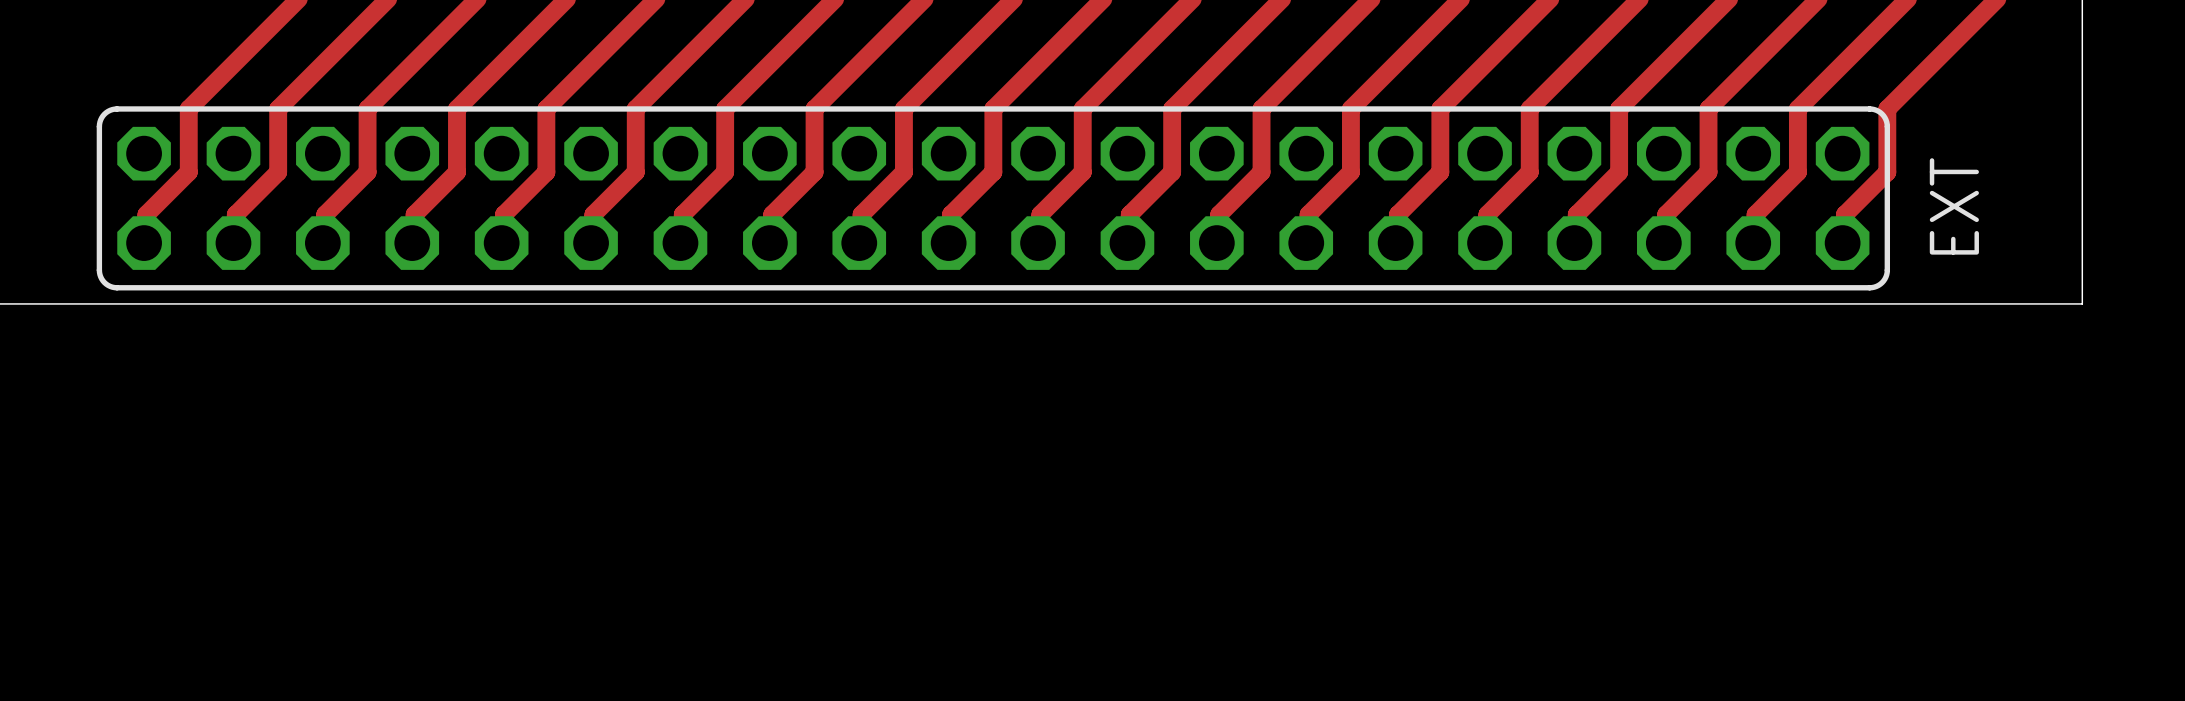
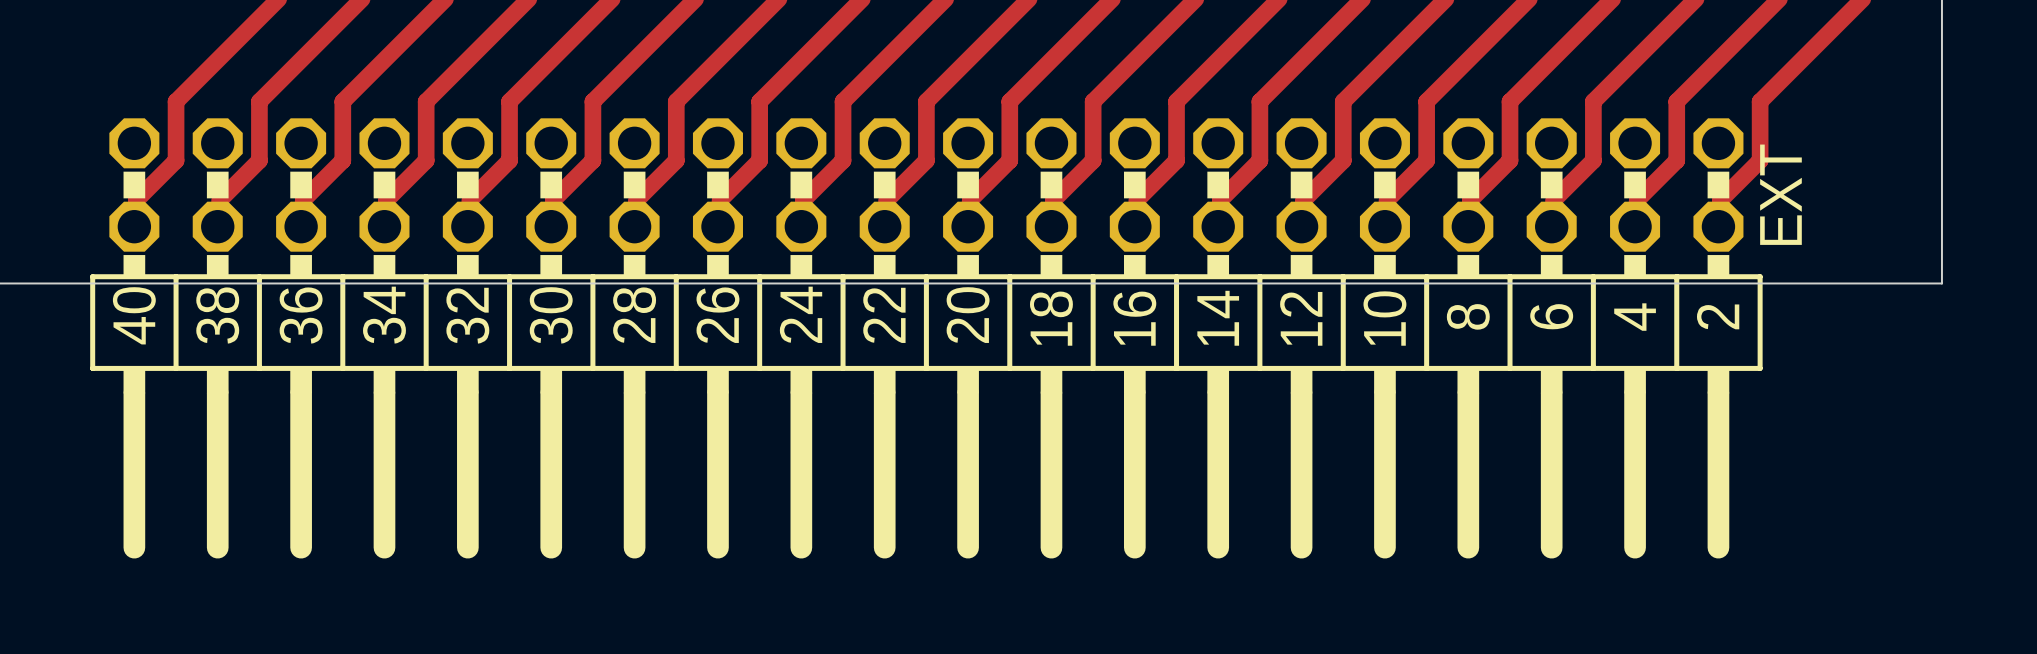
EXT: (993, 198) -> none
EXT: none -> (926, 338)

